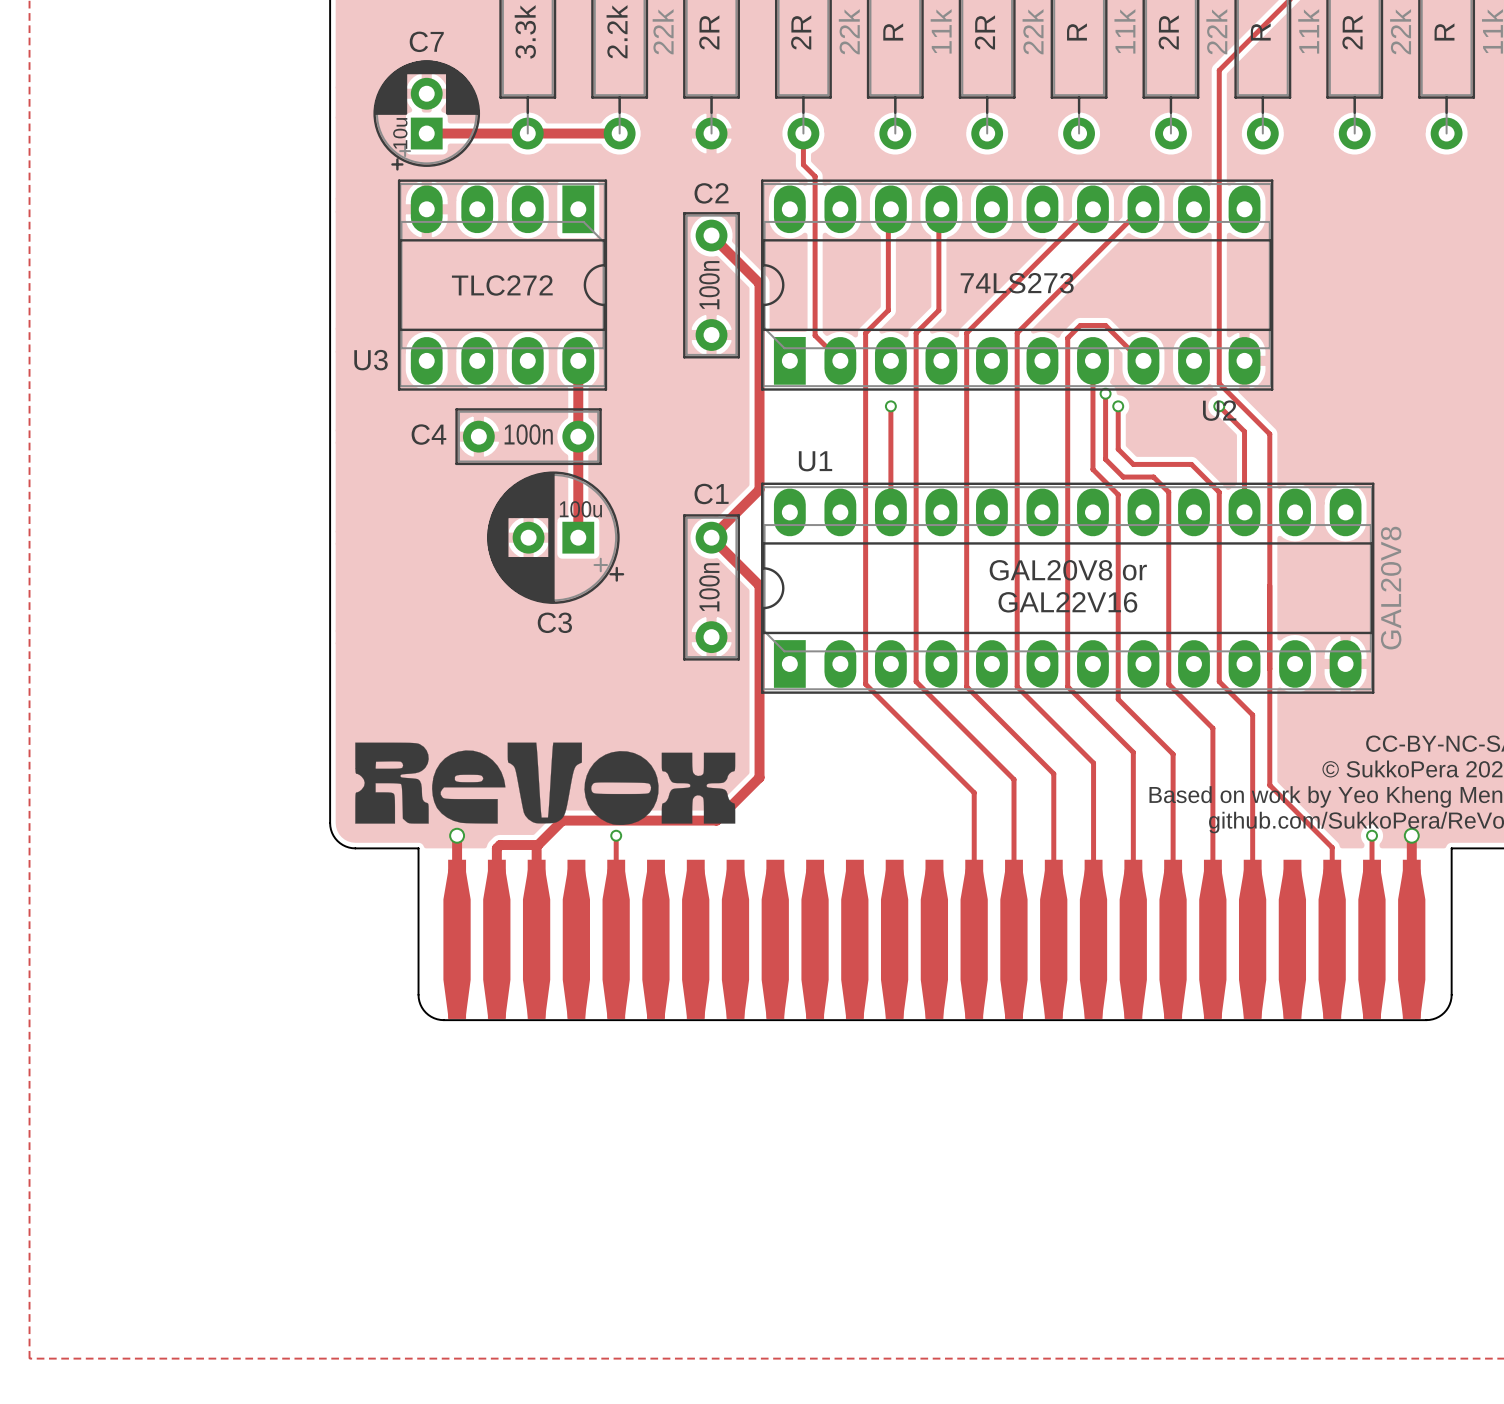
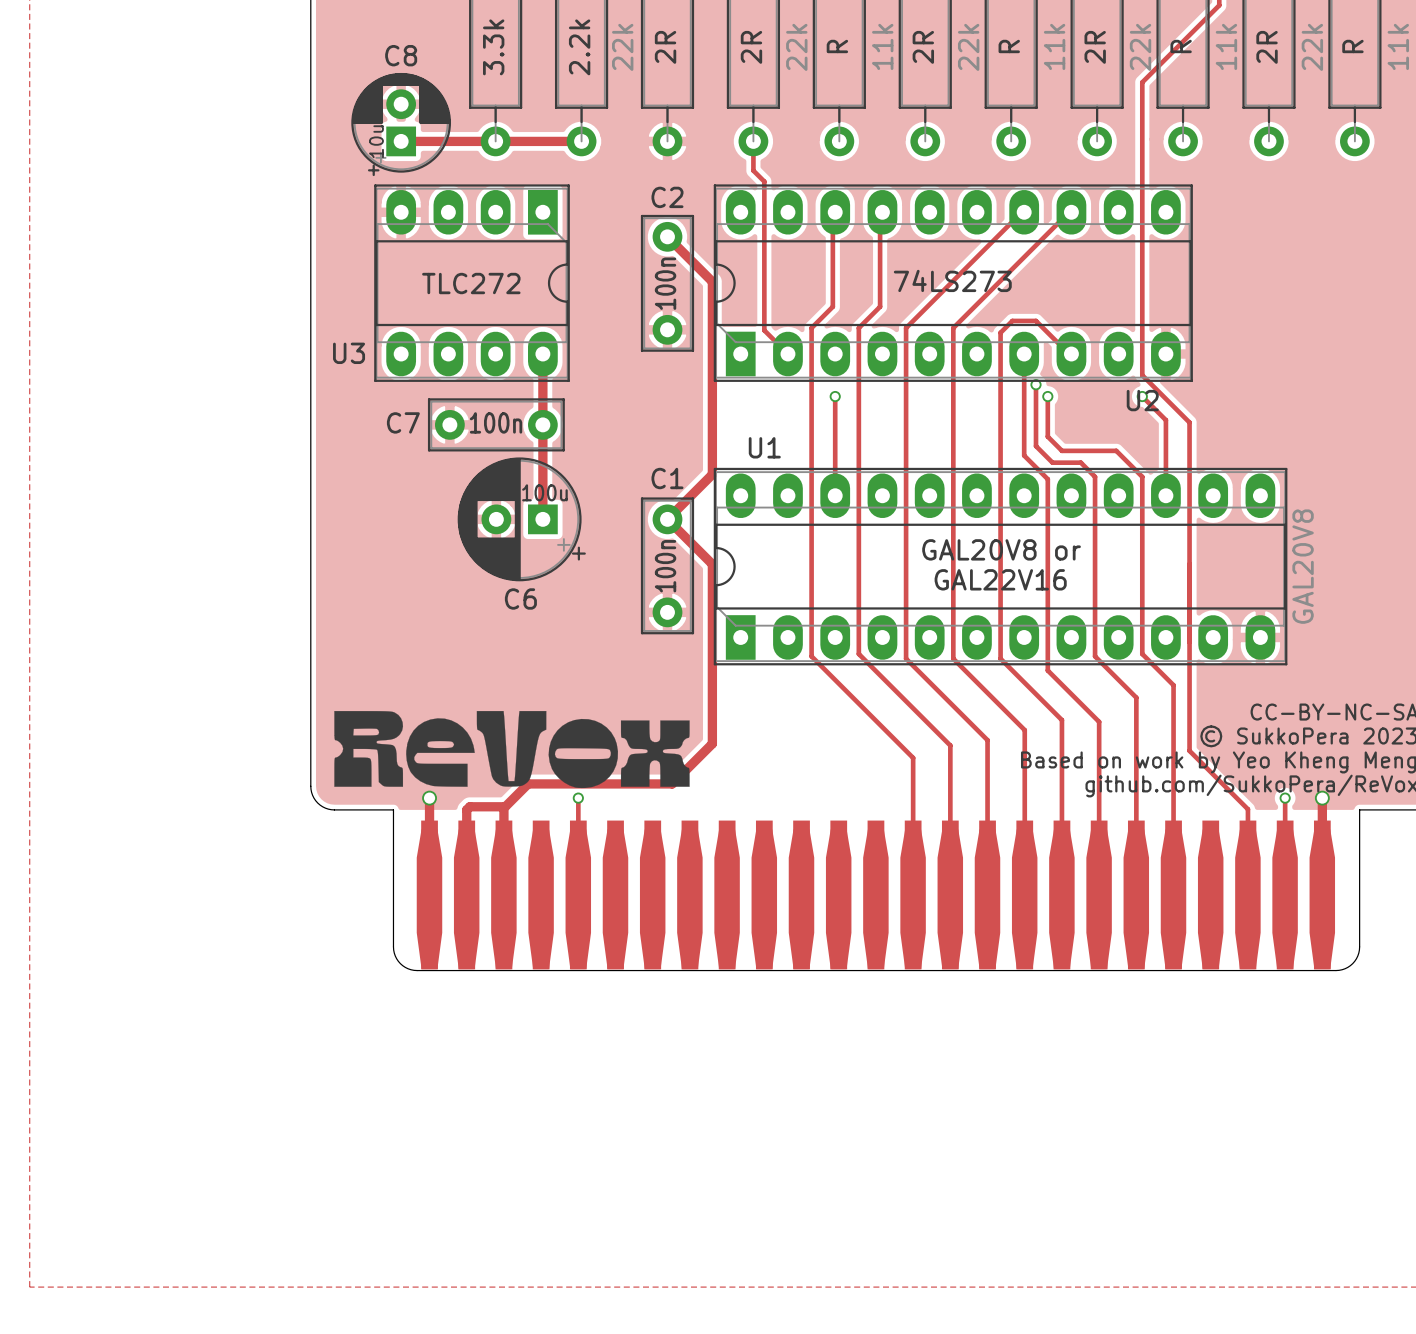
C7 name: C7 (426, 41) -> C8 (401, 55)
C4 name: C4 (428, 434) -> C7 (403, 422)
C3 name: C3 (554, 622) -> C6 (520, 598)

